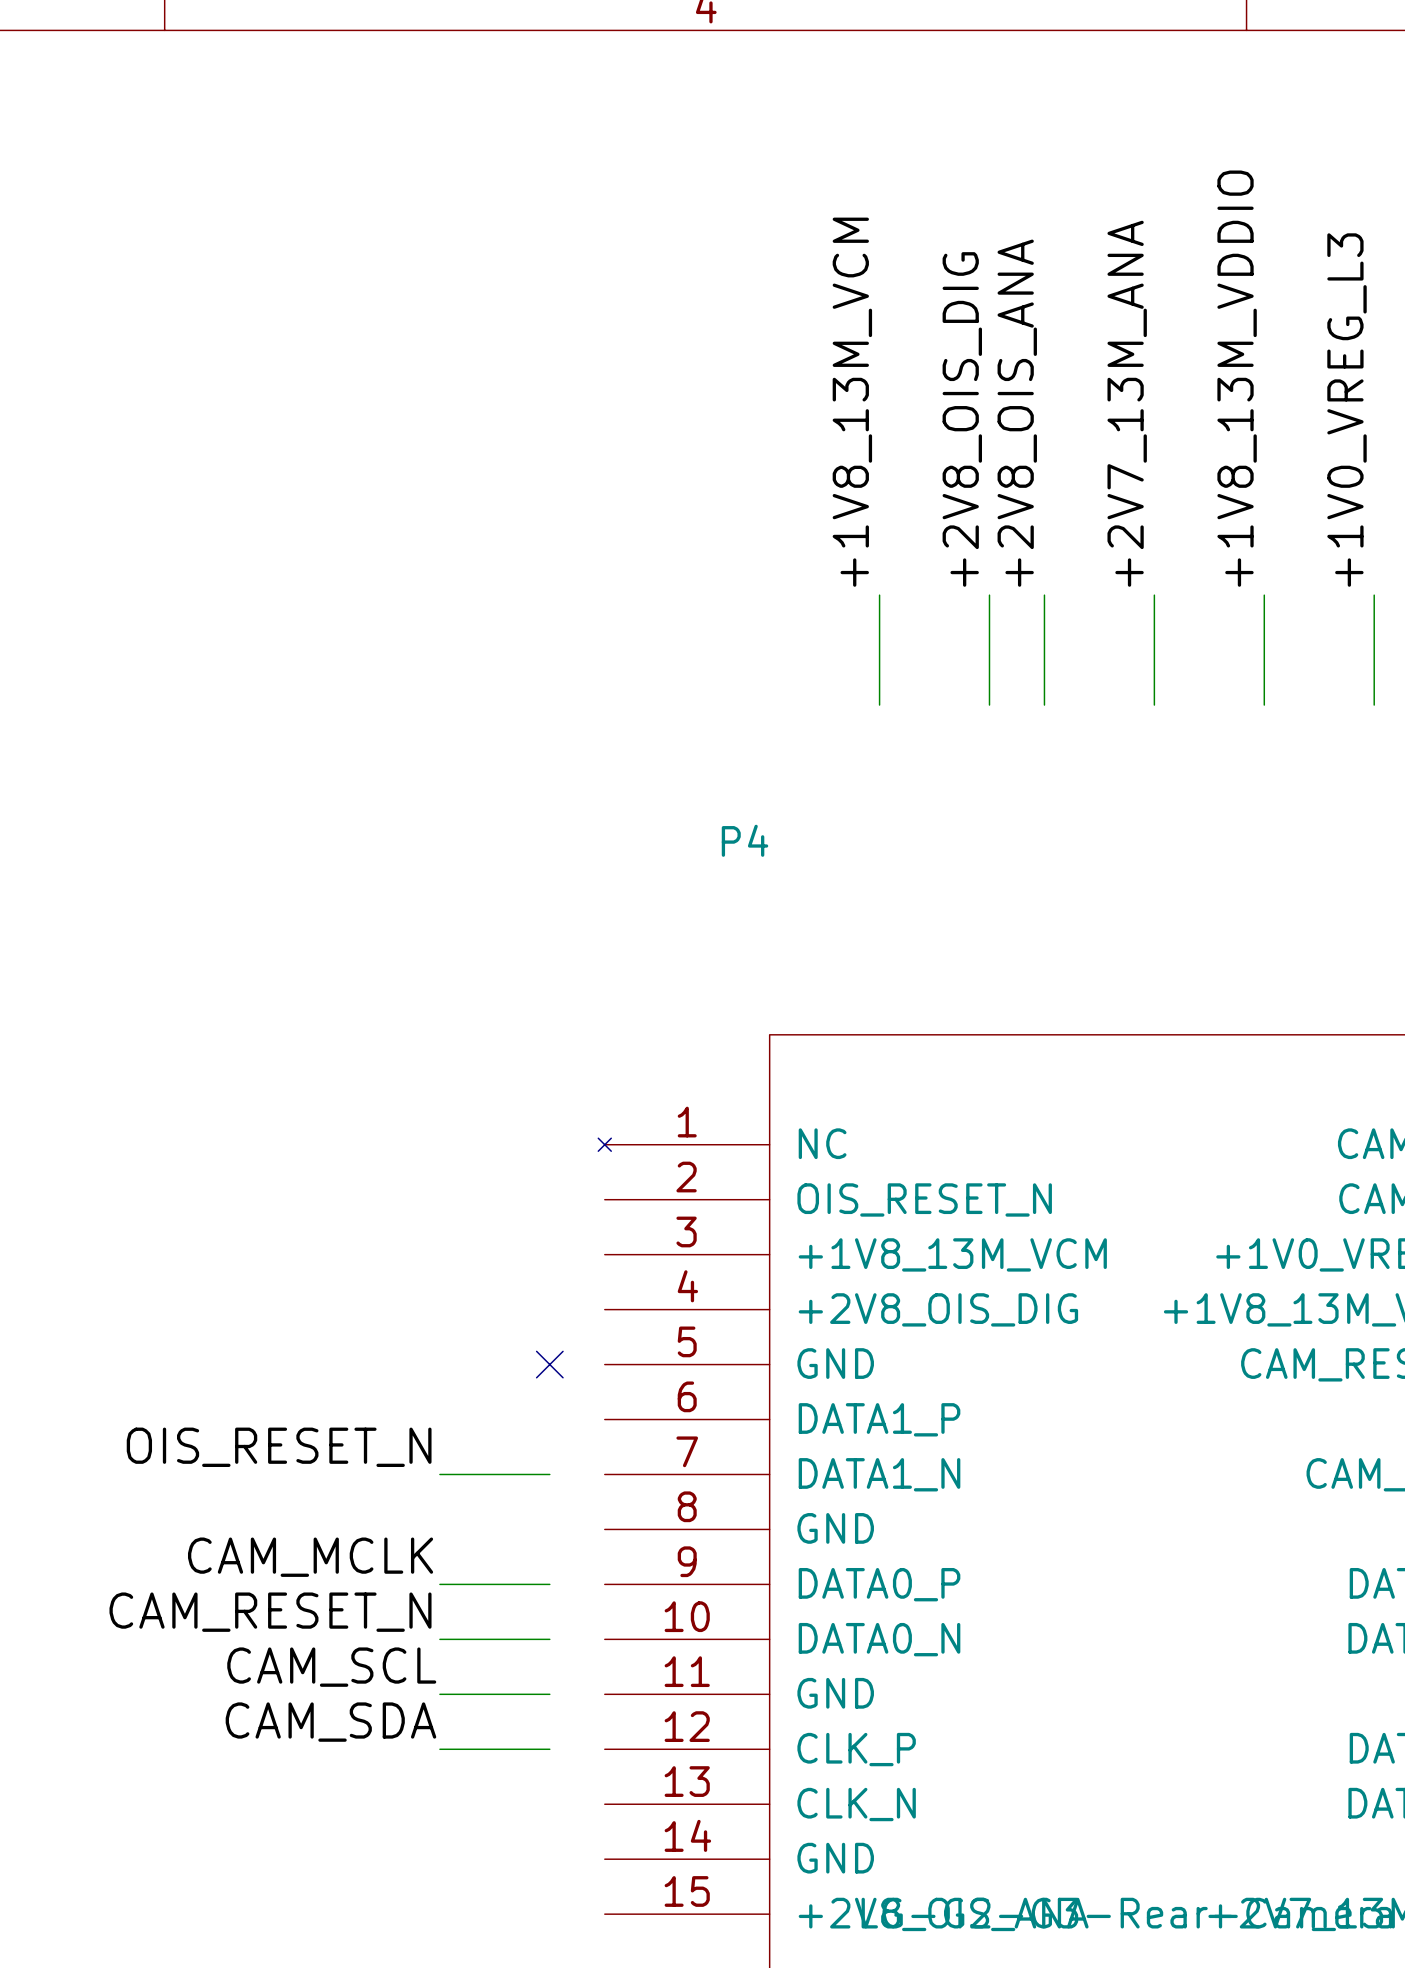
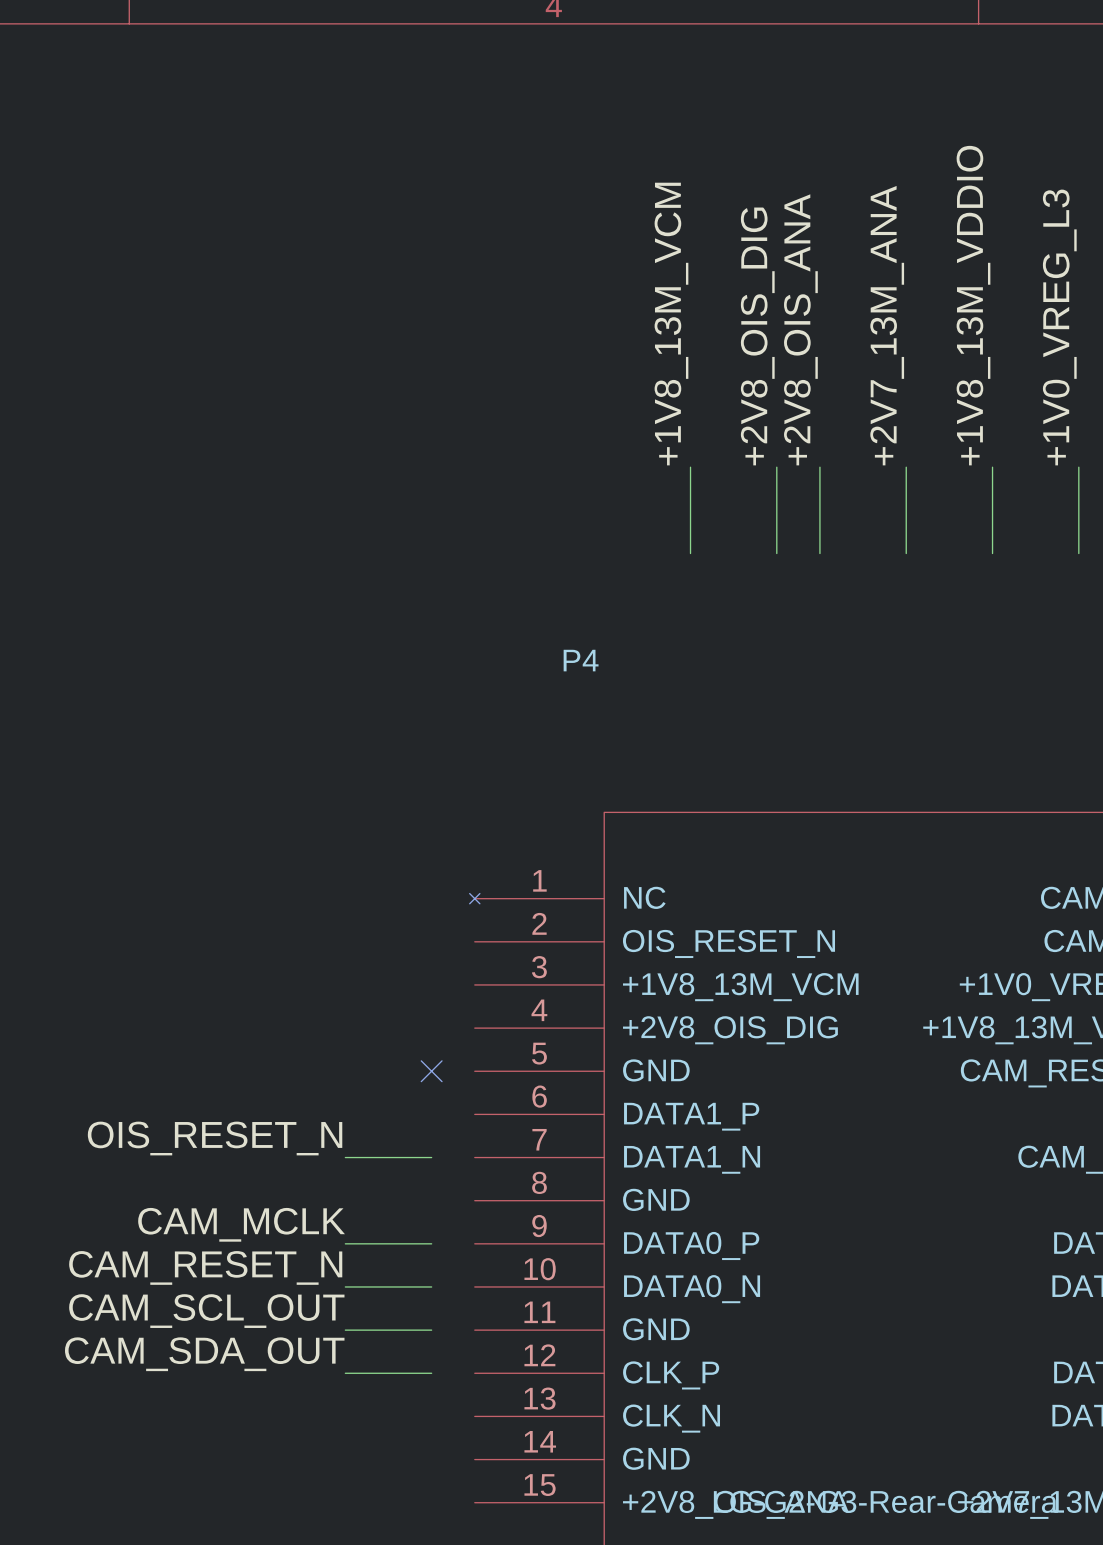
label: CAM_SCL (331, 1667) -> CAM_SCL_OUT (206, 1311)
label: CAM_SDA (330, 1722) -> CAM_SDA_OUT (204, 1354)

